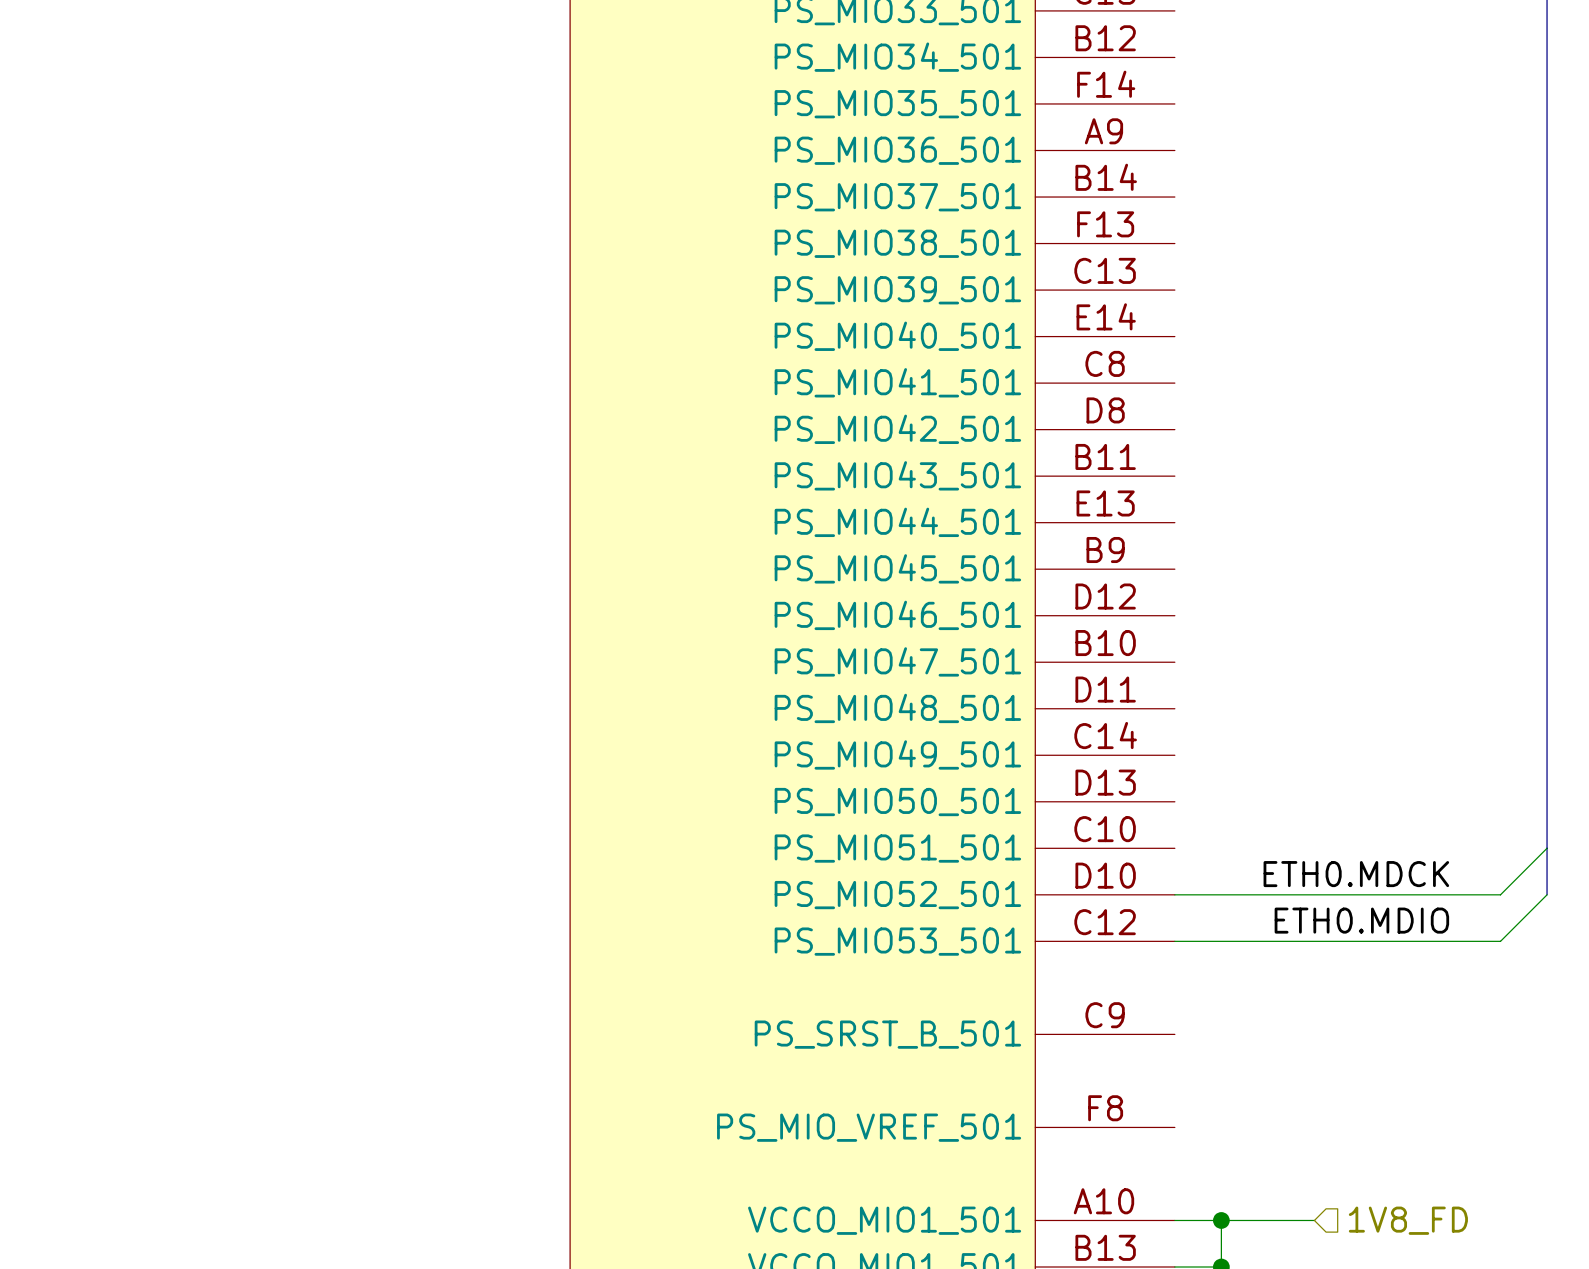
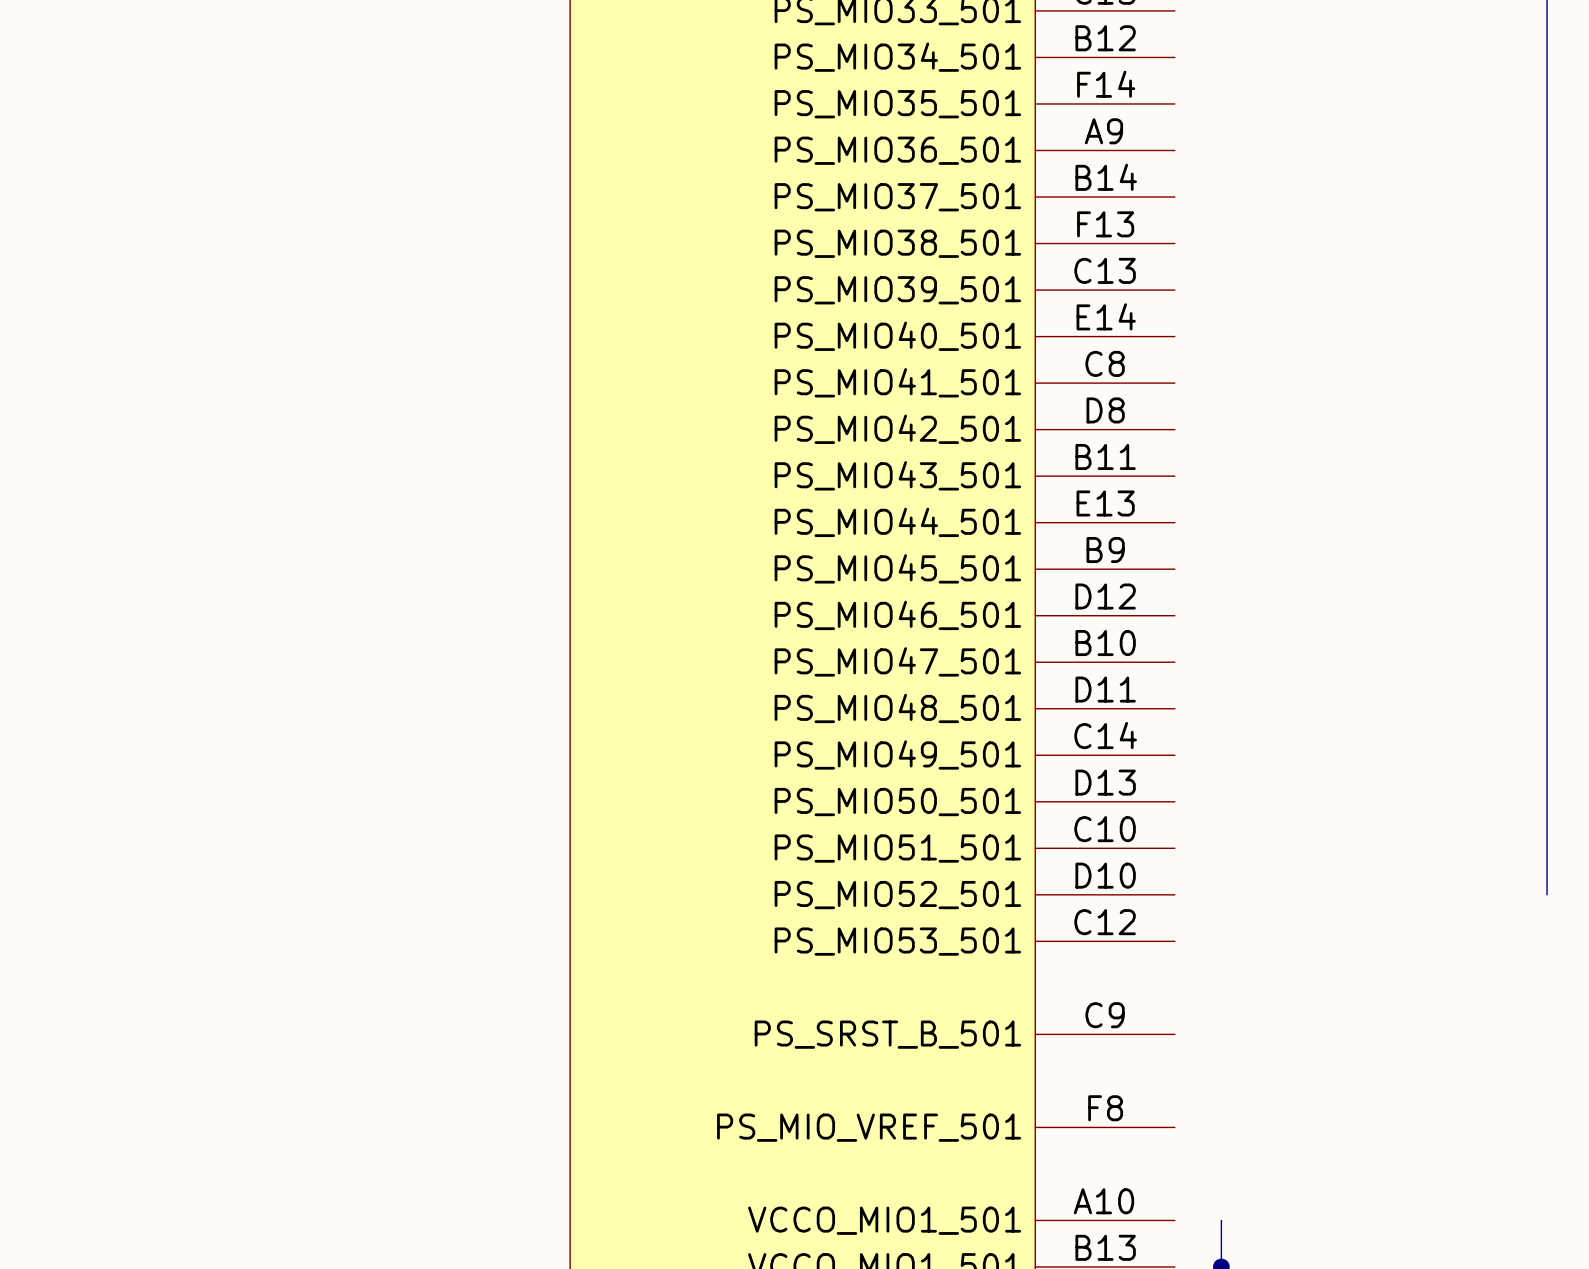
wire: (1547, 848) (1500, 894) (1174, 894) -> none
label: ETH0.MDCK (1356, 874) -> none
wire: (1547, 894) (1500, 941) (1174, 941) -> none
label: ETH0.MDIO (1361, 920) -> none
wire: (1174, 1220) (1314, 1220) -> none
junction: (1221, 1220) -> none
hierarchical label: 1V8_FD (1408, 1220) -> none
wire: (1174, 1267) (1221, 1267) -> none

